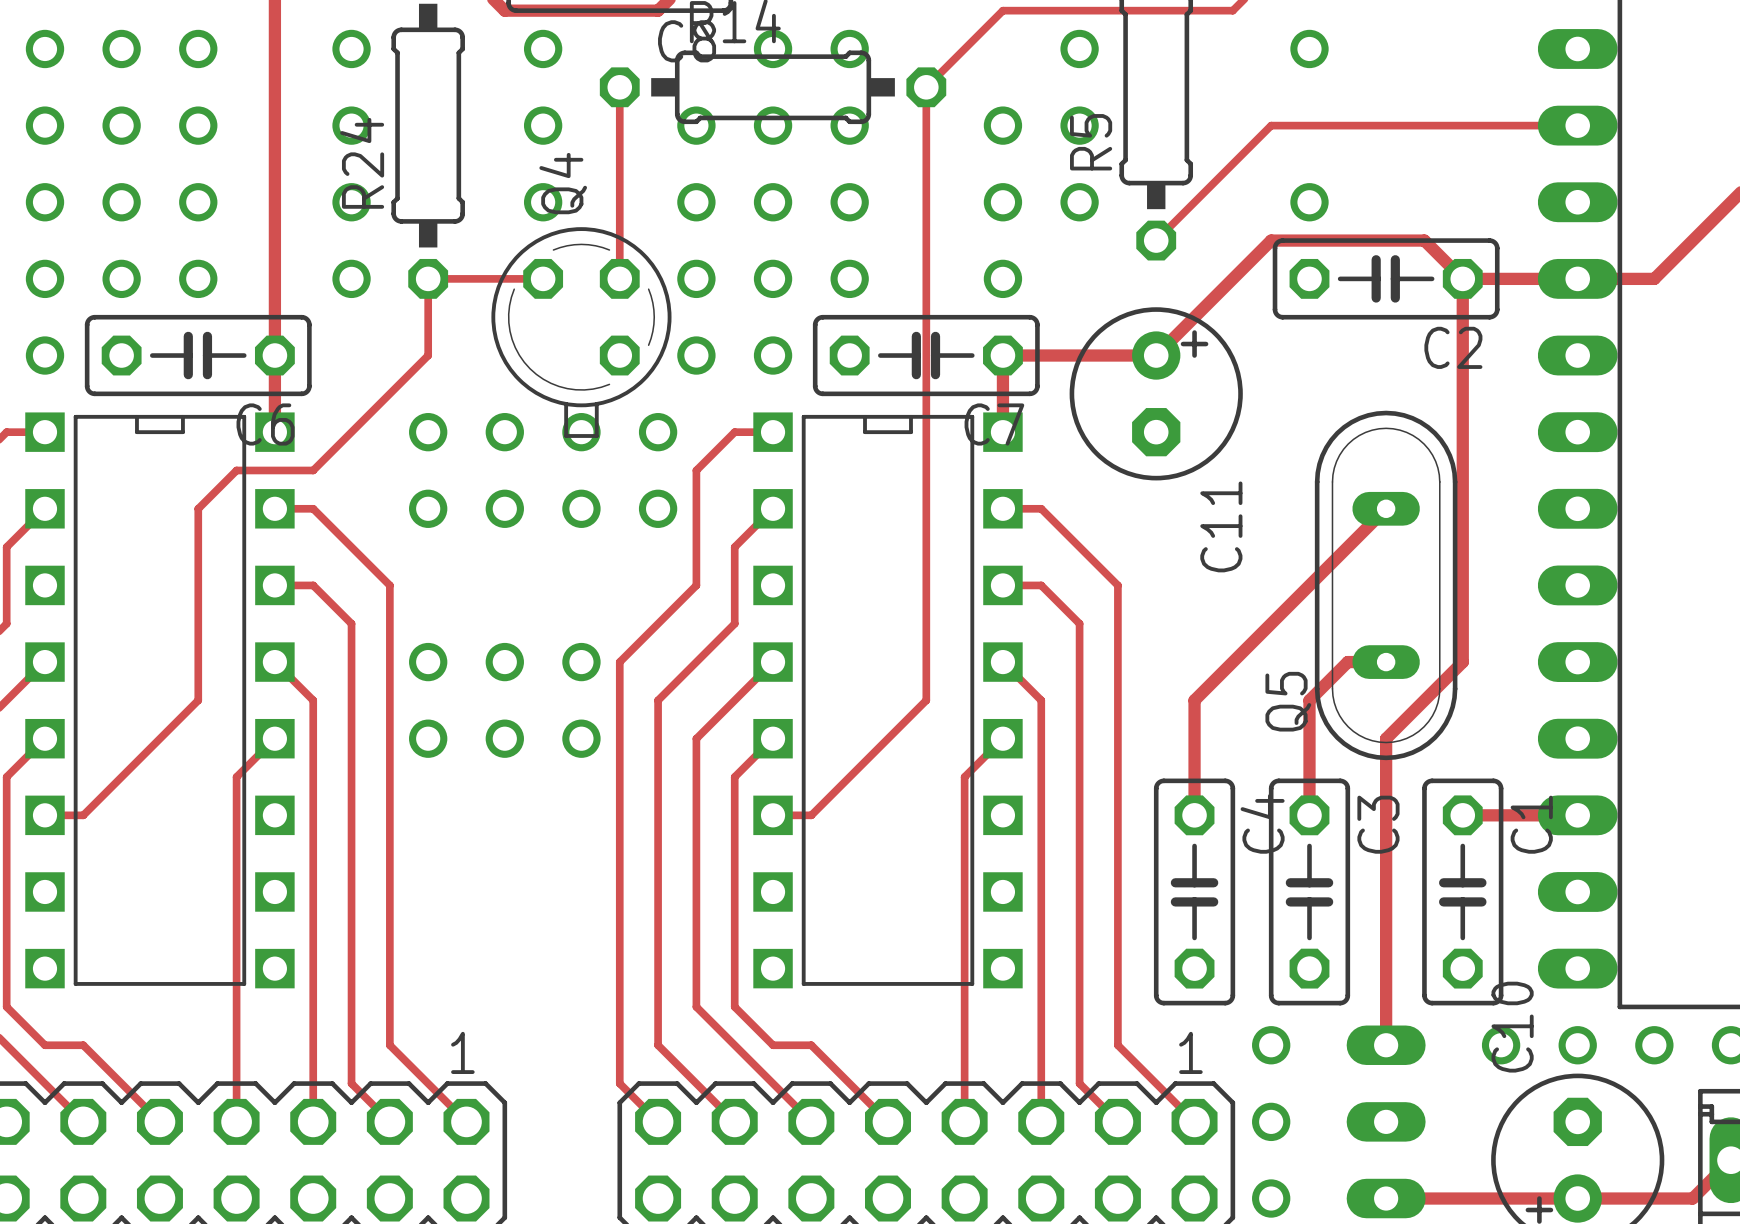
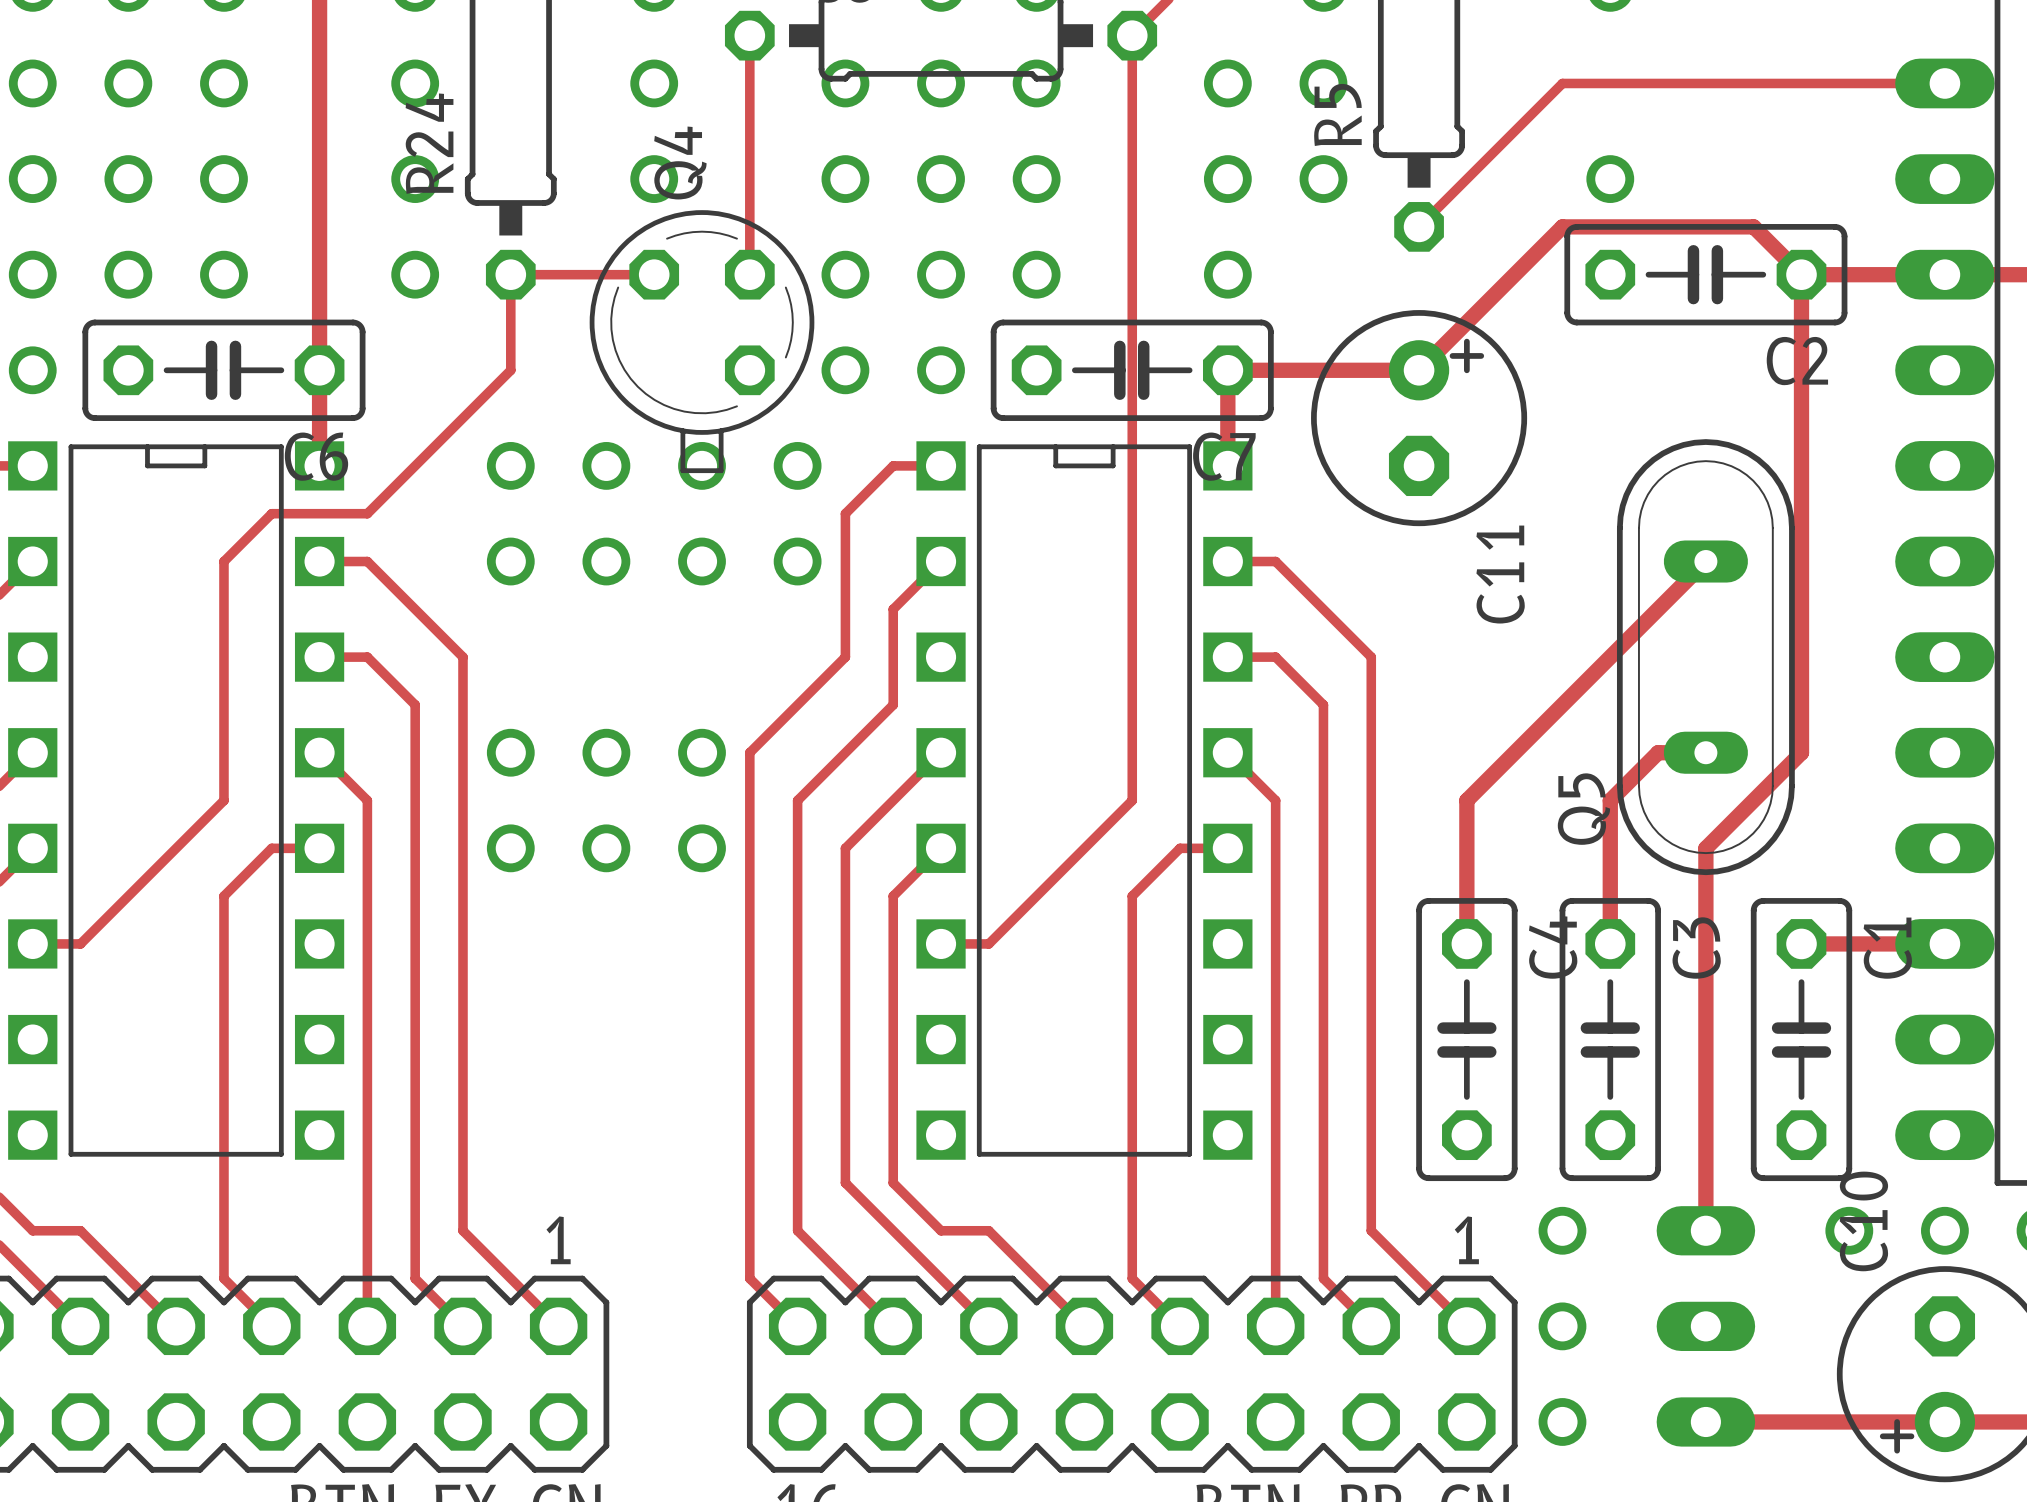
track: (274, 738) (236, 777) (236, 1121) -> (319, 848) (271, 848) (223, 896) (223, 1278) (271, 1326)
track: (1002, 738) (964, 777) (964, 1121) -> (1227, 848) (1180, 848) (1132, 896) (1132, 1278) (1180, 1326)

